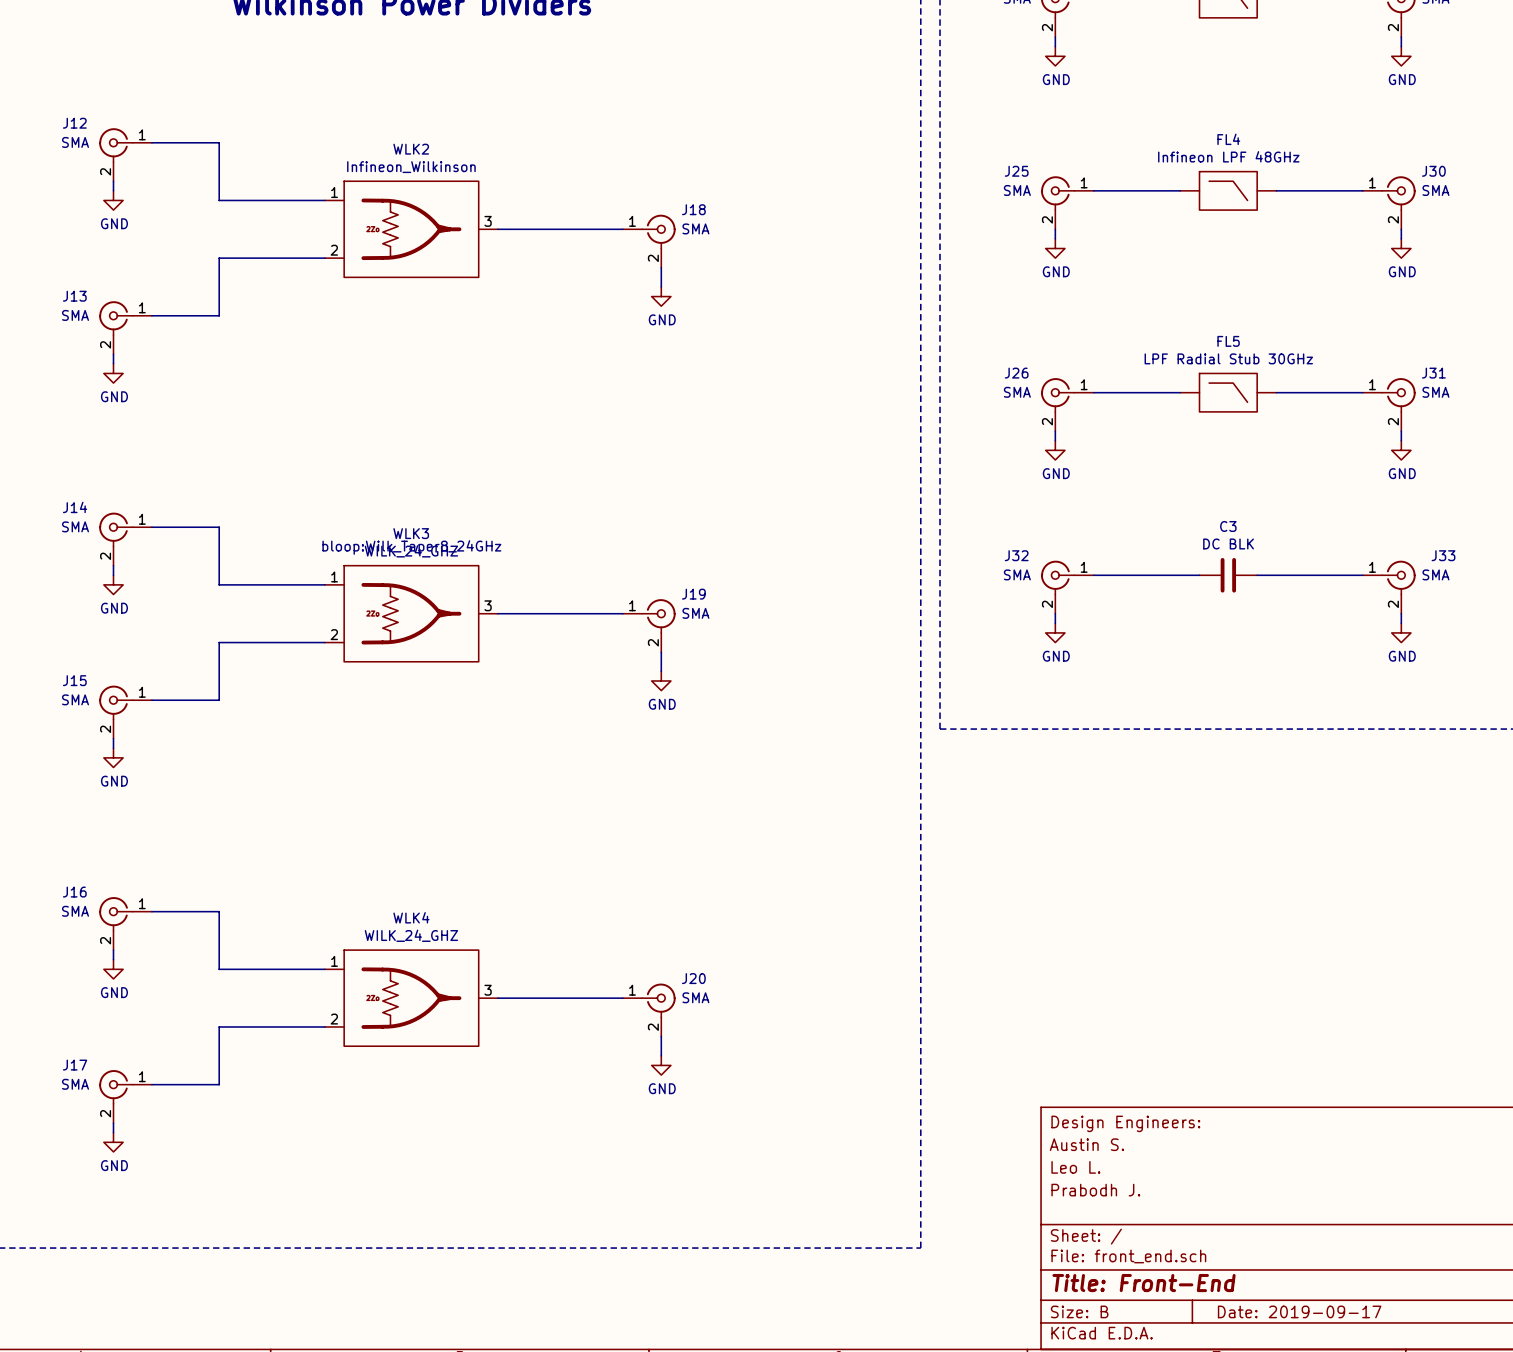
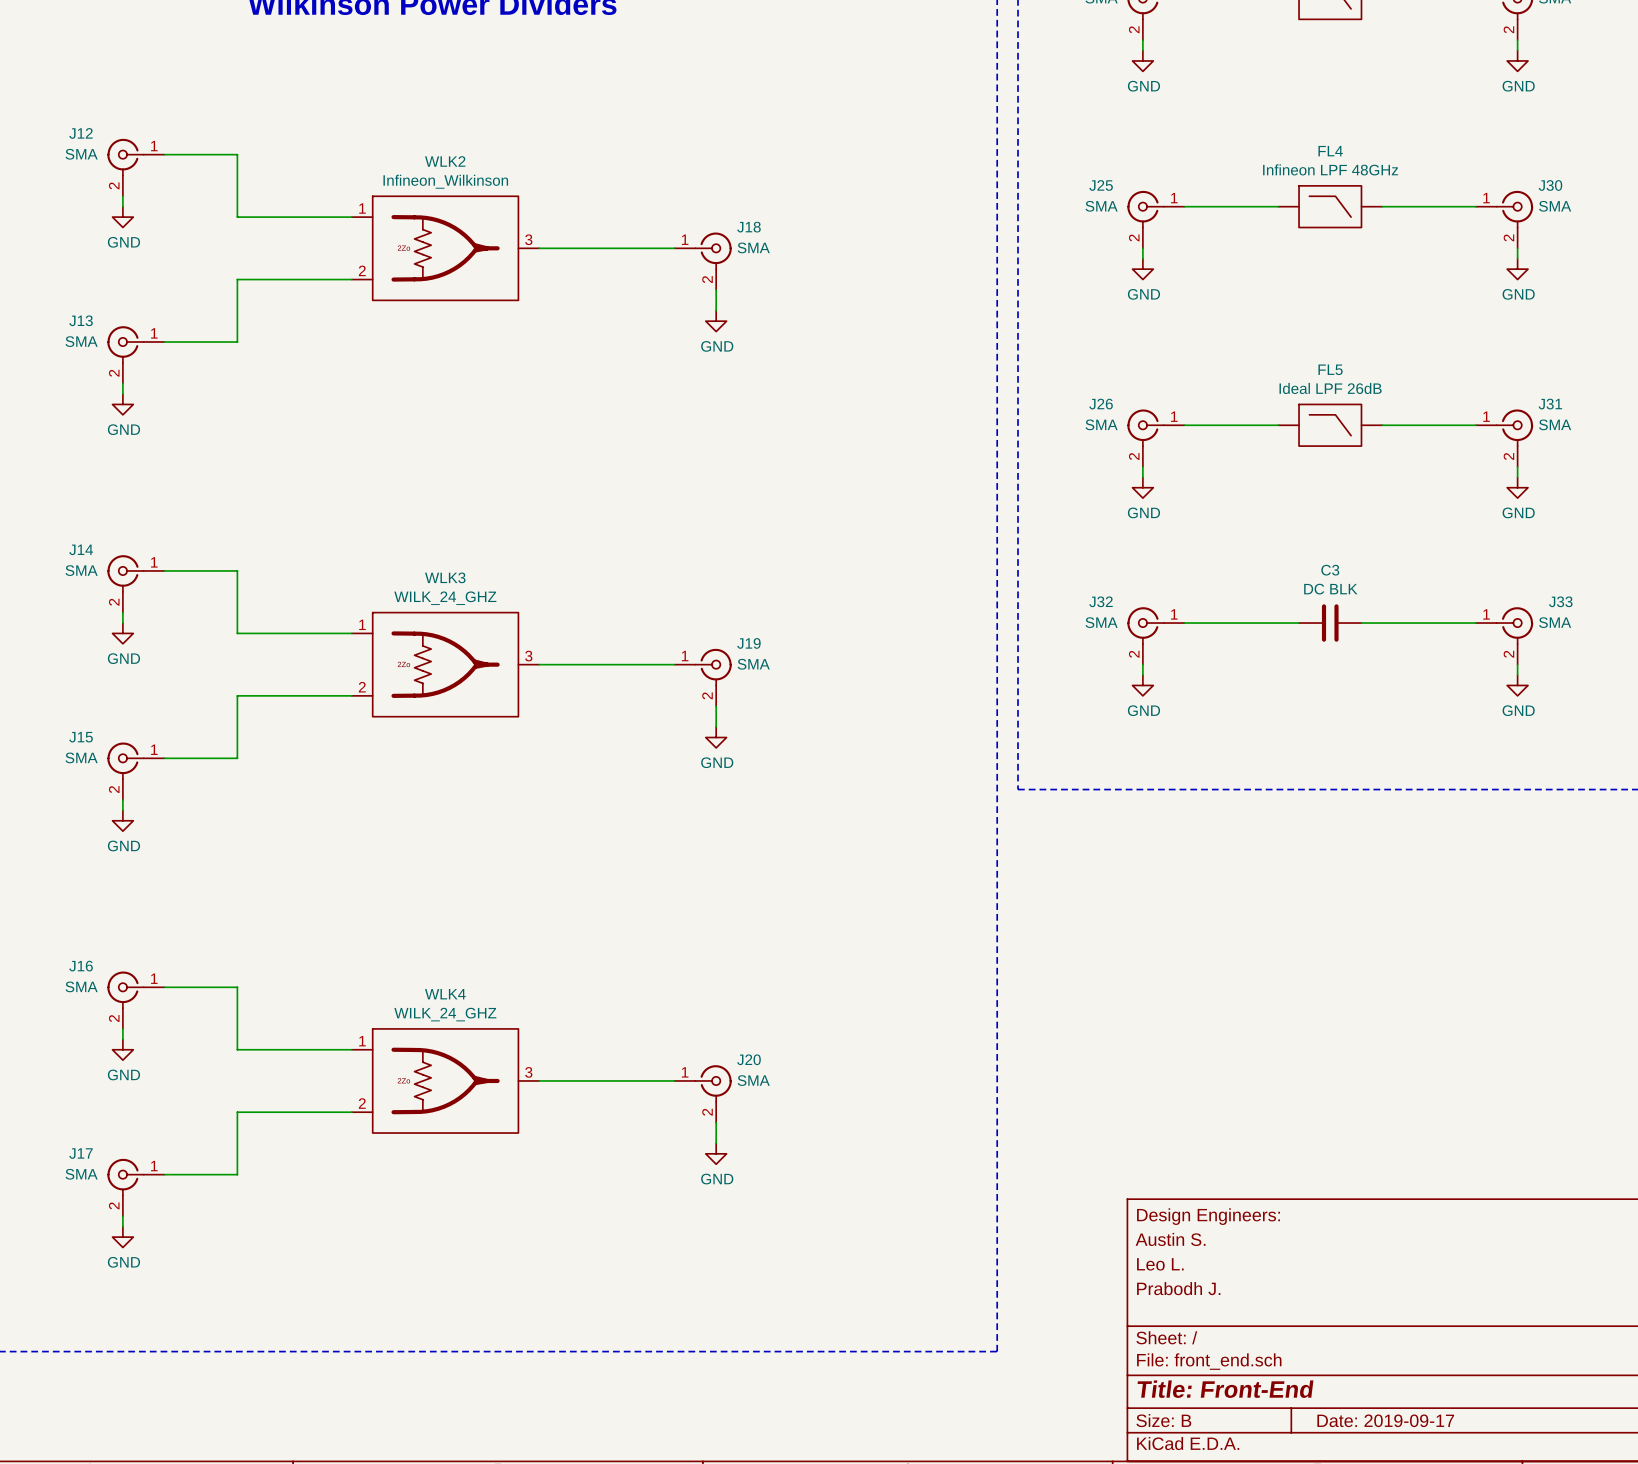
FL5 value: LPF Radial Stub 30GHz (1228, 358) -> Ideal LPF 26dB (1330, 388)
WLK3 text: bloop:Wilk_Taper8_24GHz (411, 547) -> none

